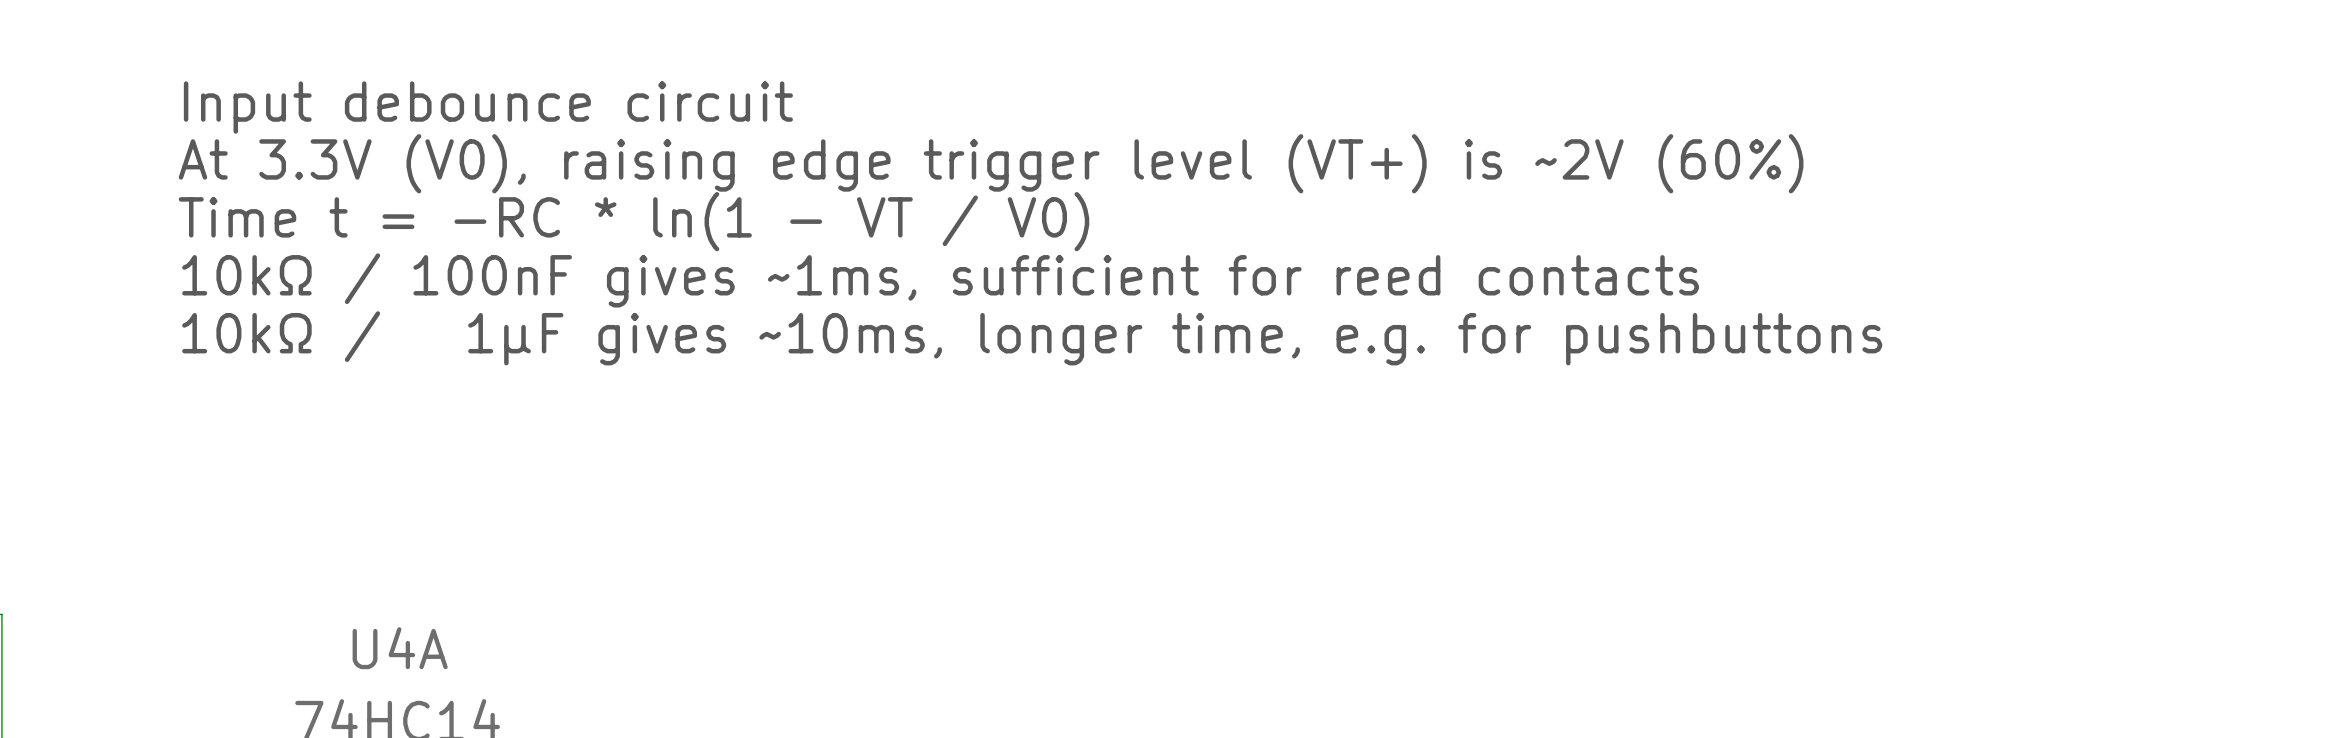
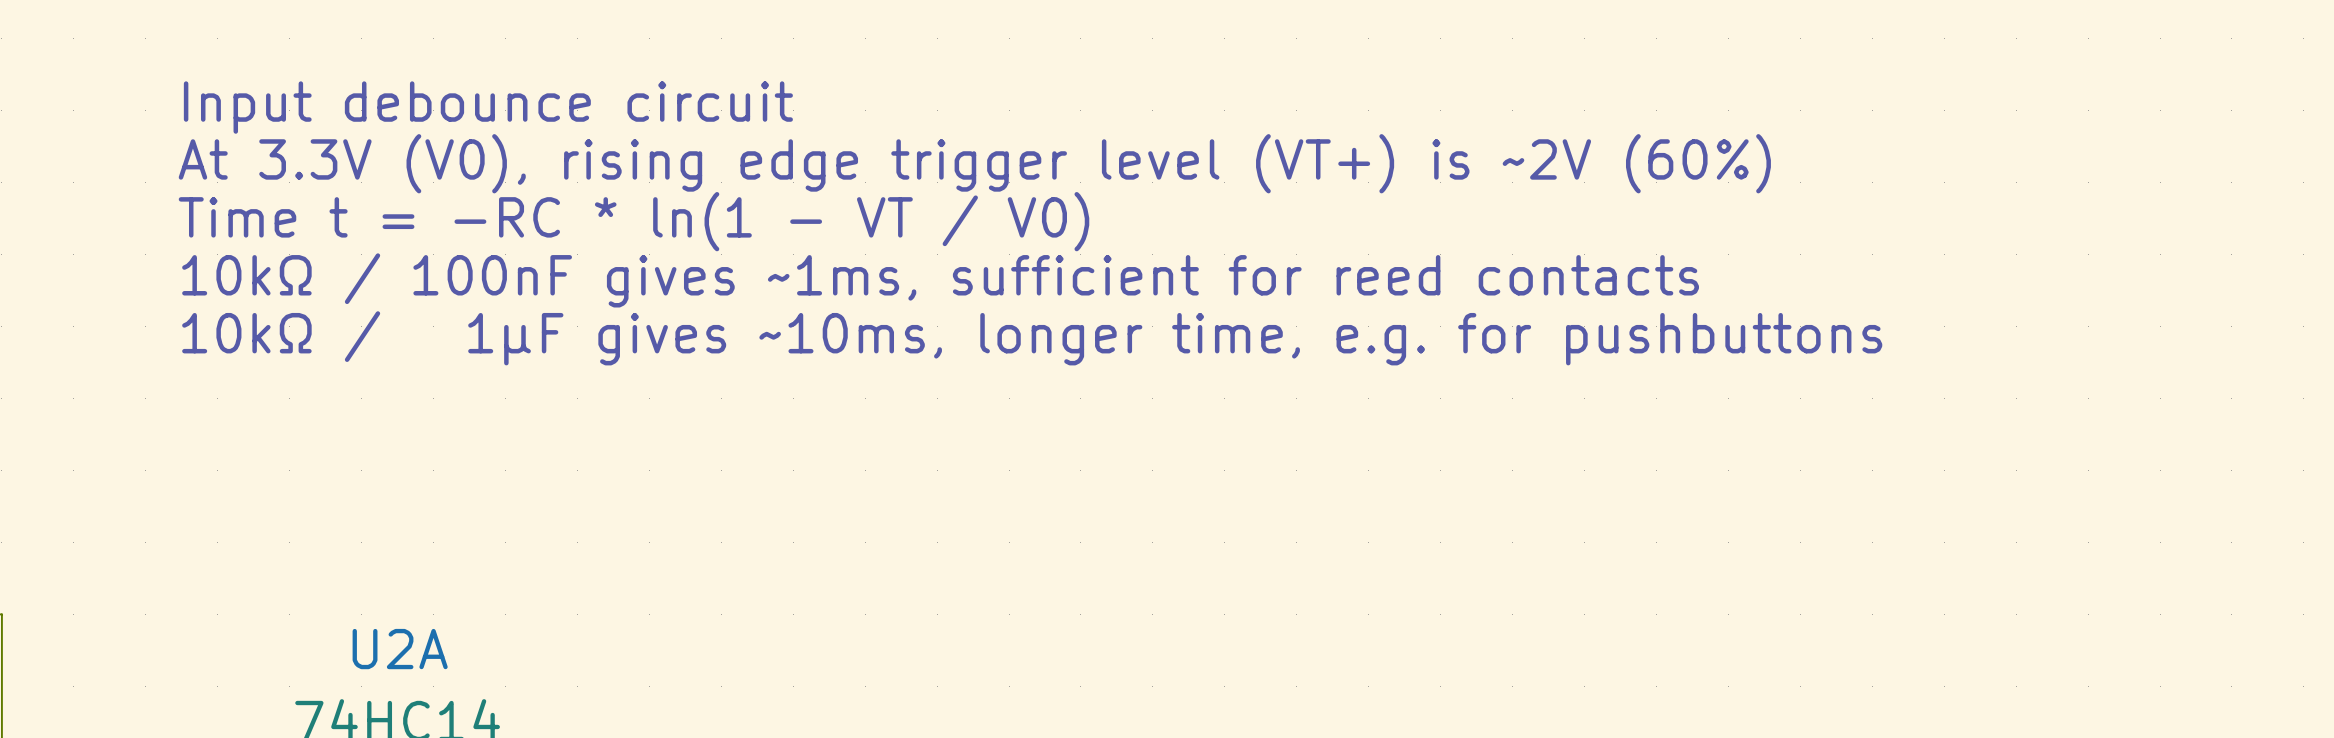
text: At 3.3V (V0), raising edge trigger level (VT+) is ~2V (60%) (991, 163) -> At 3.3V (V0), rising edge trigger level (VT+) is ~2V (60%) (974, 163)
U4A name: U4A (400, 648) -> U2A (400, 649)

